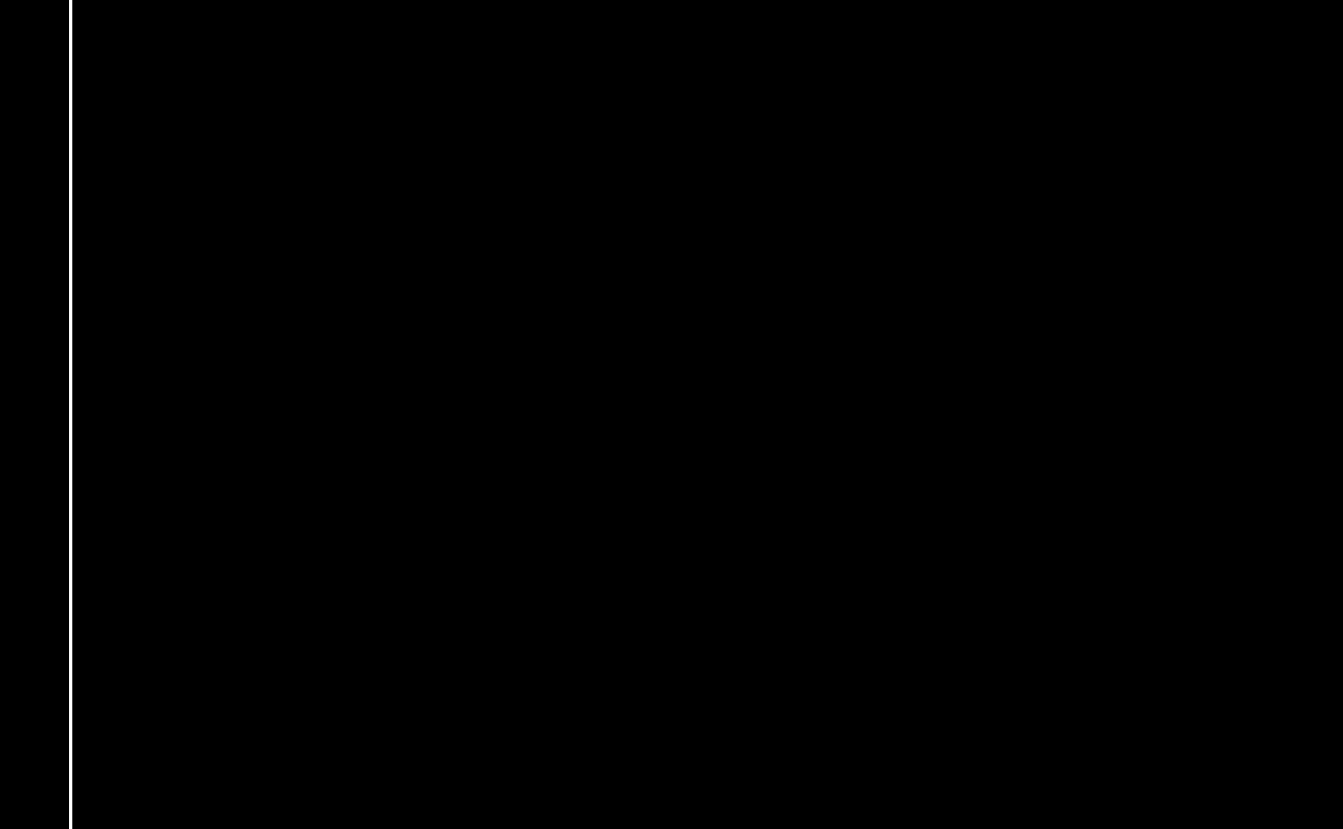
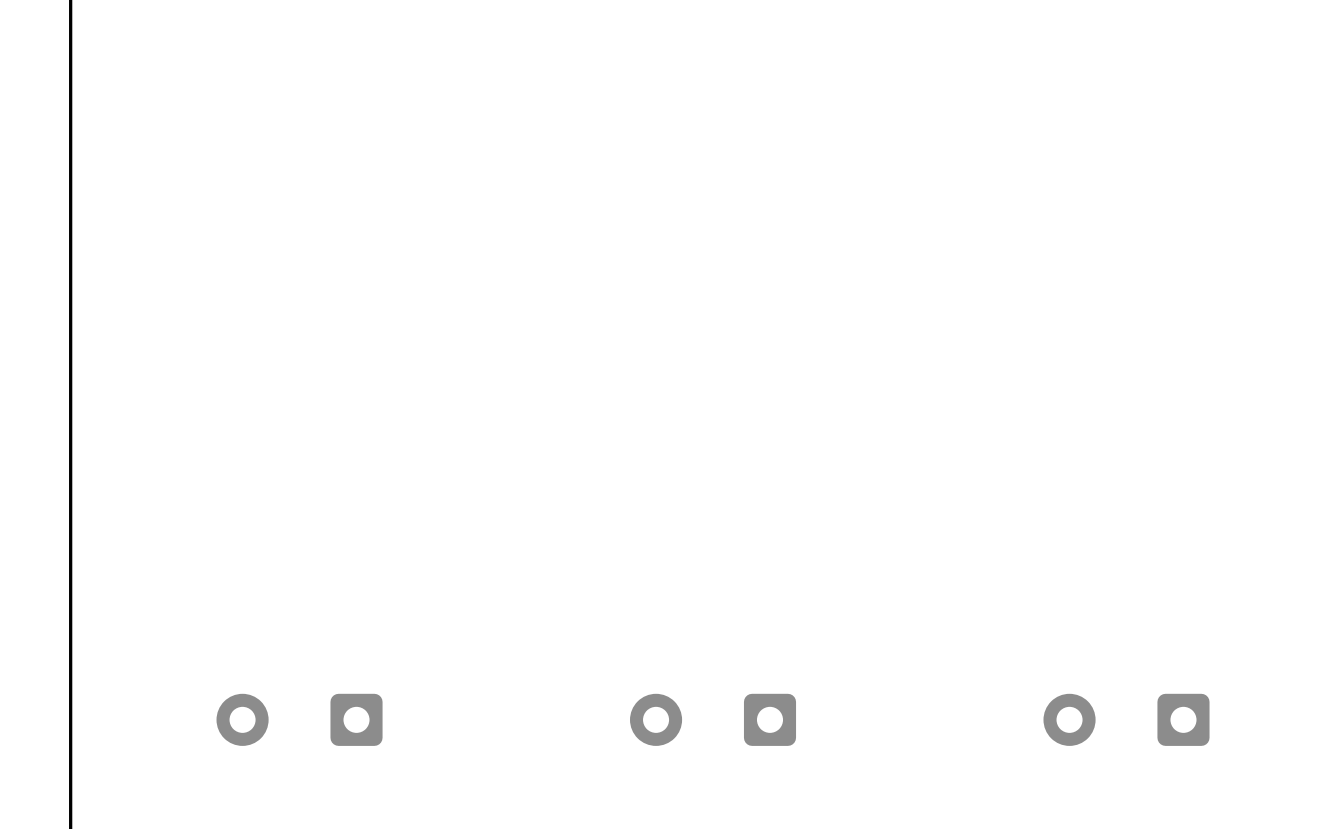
part: none -> (299, 719)
part: none -> (713, 719)
part: none -> (1126, 719)

